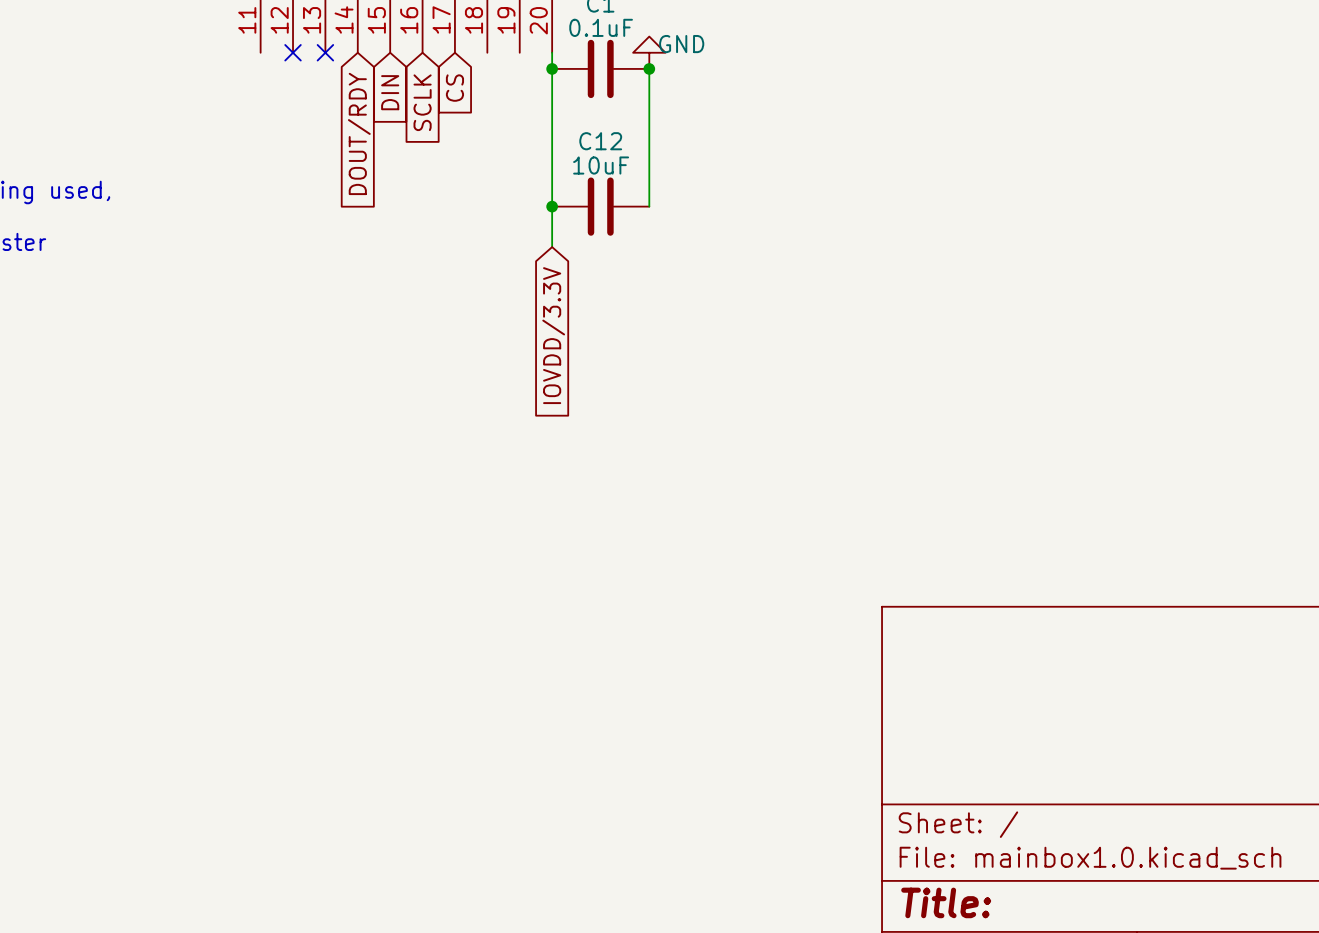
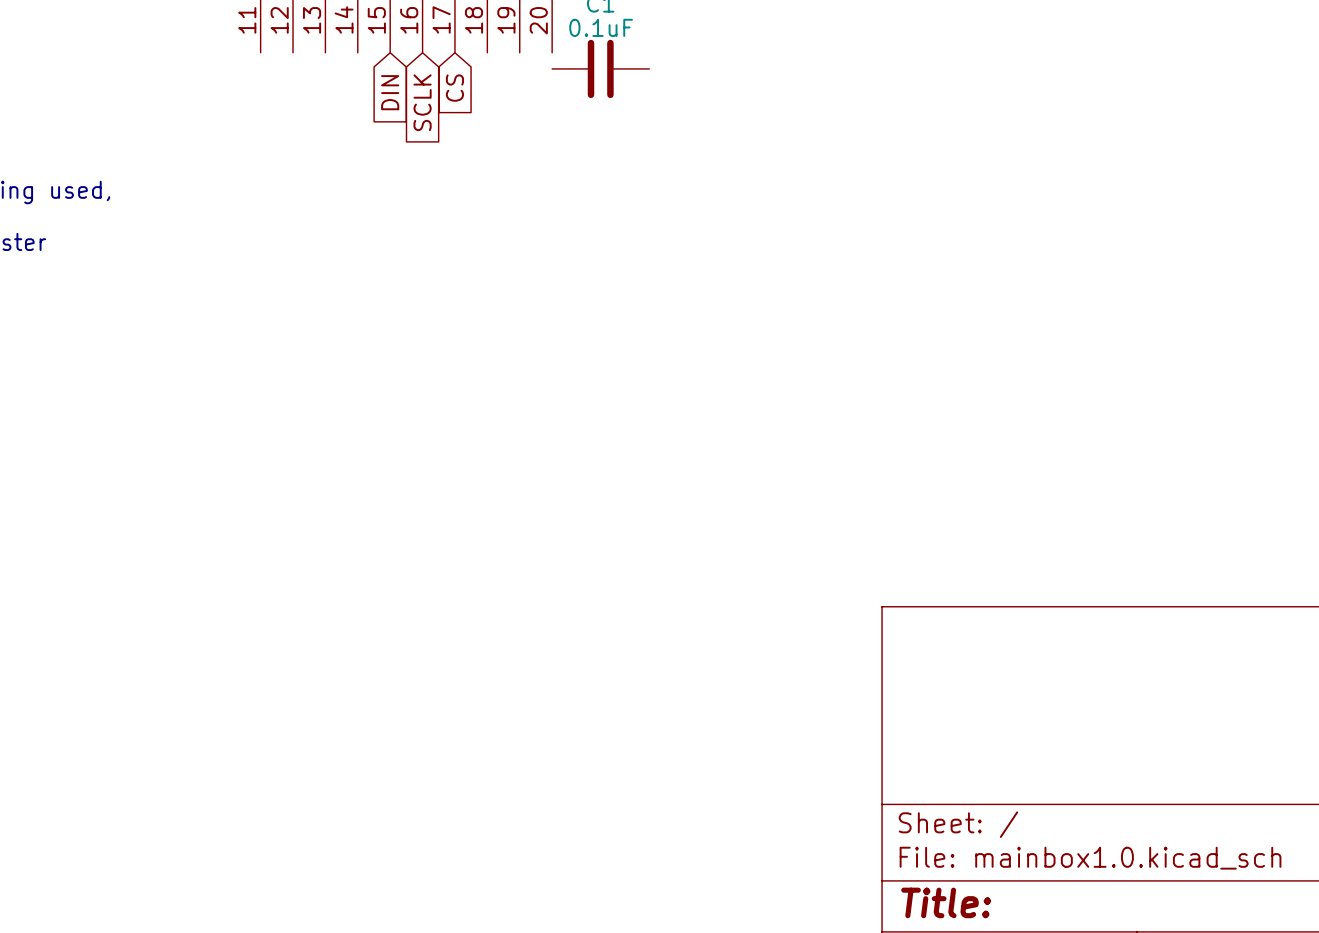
no-connect mark: (293, 52) -> none
no-connect mark: (325, 52) -> none
wire: (552, 52) (552, 247) -> none
power symbol: GND (649, 52) -> none
junction: (552, 68) -> none
wire: (649, 68) (649, 206) -> none
junction: (649, 68) -> none
global label: DOUT/RDY (359, 133) -> none
junction: (552, 206) -> none
C12: 10uF (600, 206) -> none
global label: IOVDD/3.3V (553, 335) -> none

